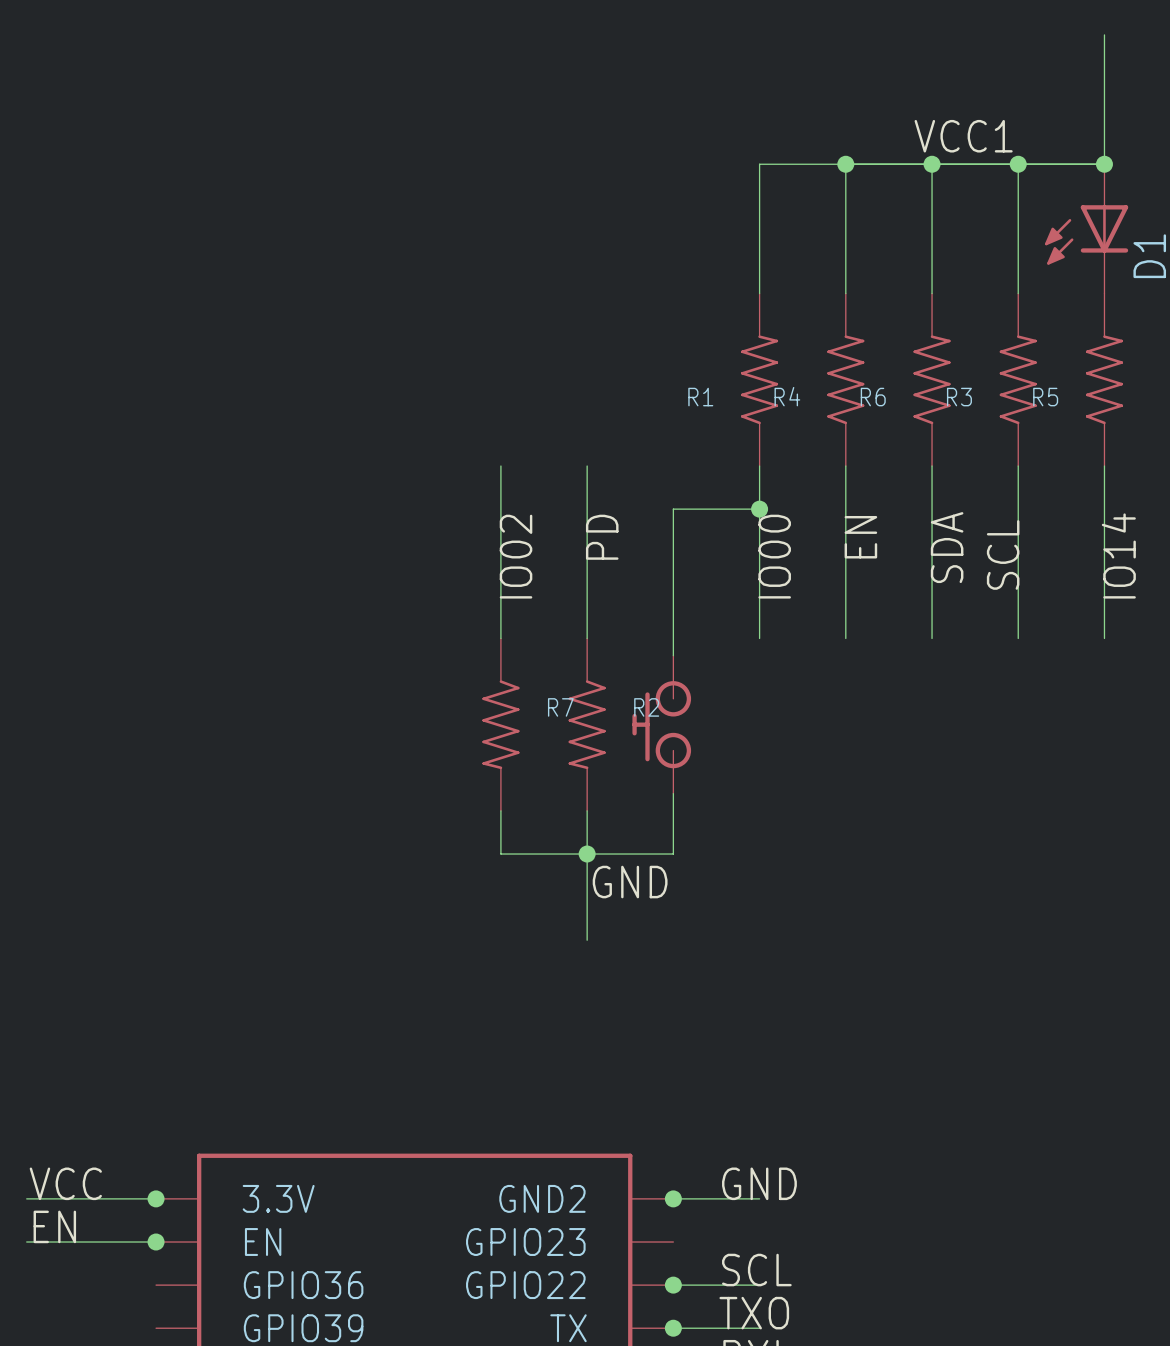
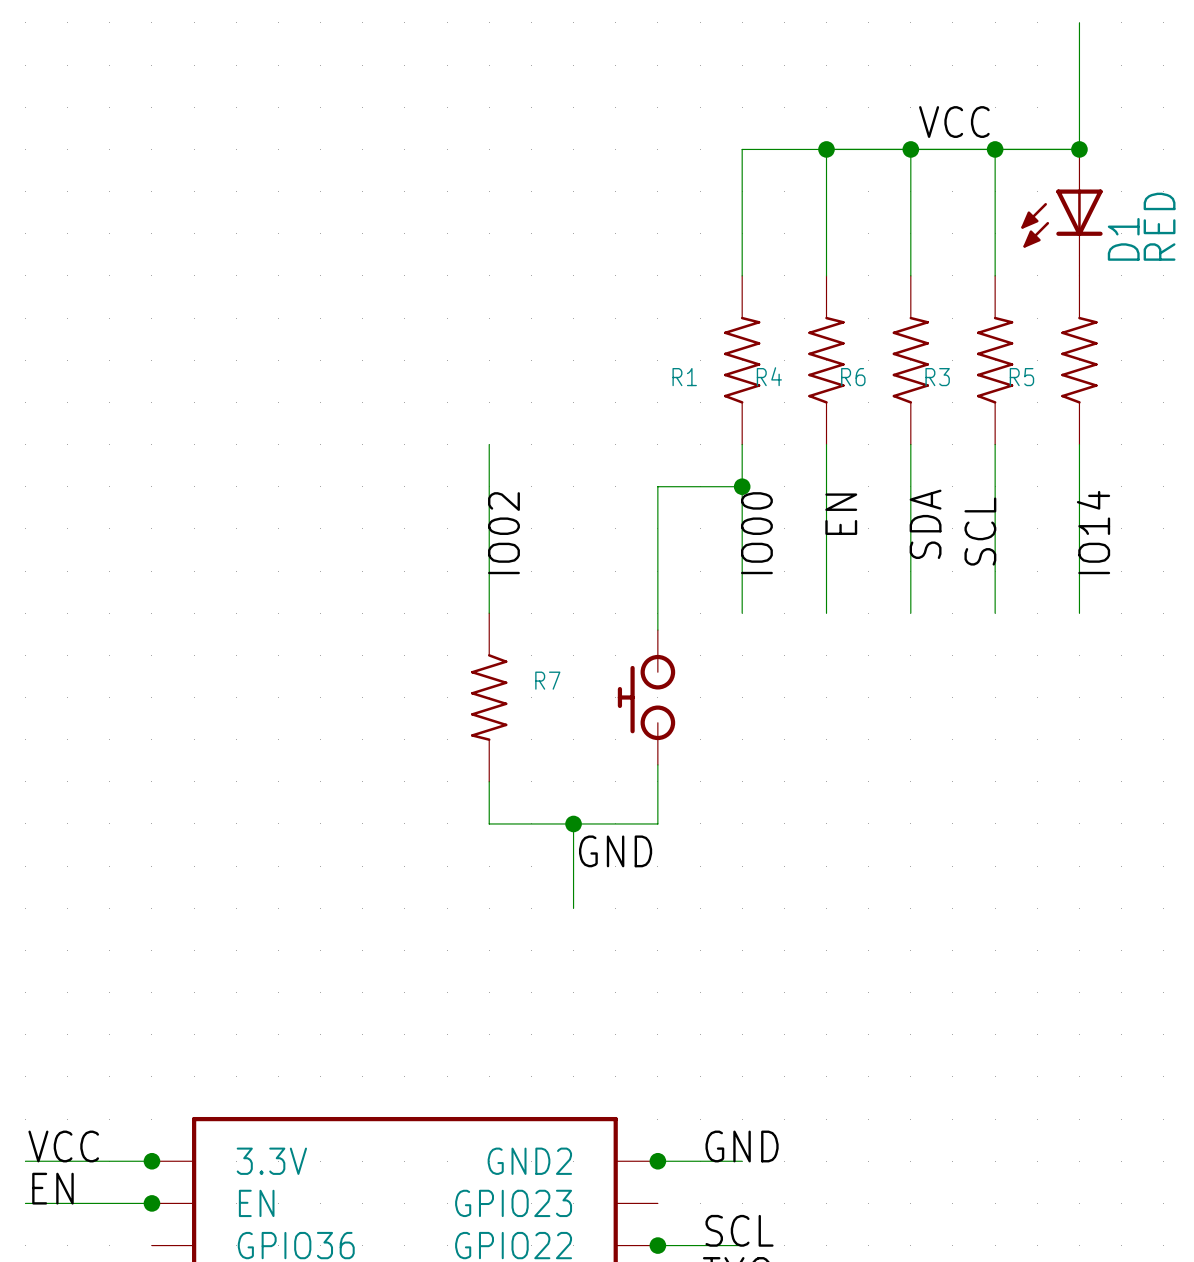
label: VCC1 (963, 136) -> VCC (954, 122)
wire: (587, 466) (587, 638) -> none
label: PD (602, 537) -> none
R2: (587, 724) -> none
wire: (587, 810) (587, 854) -> none

